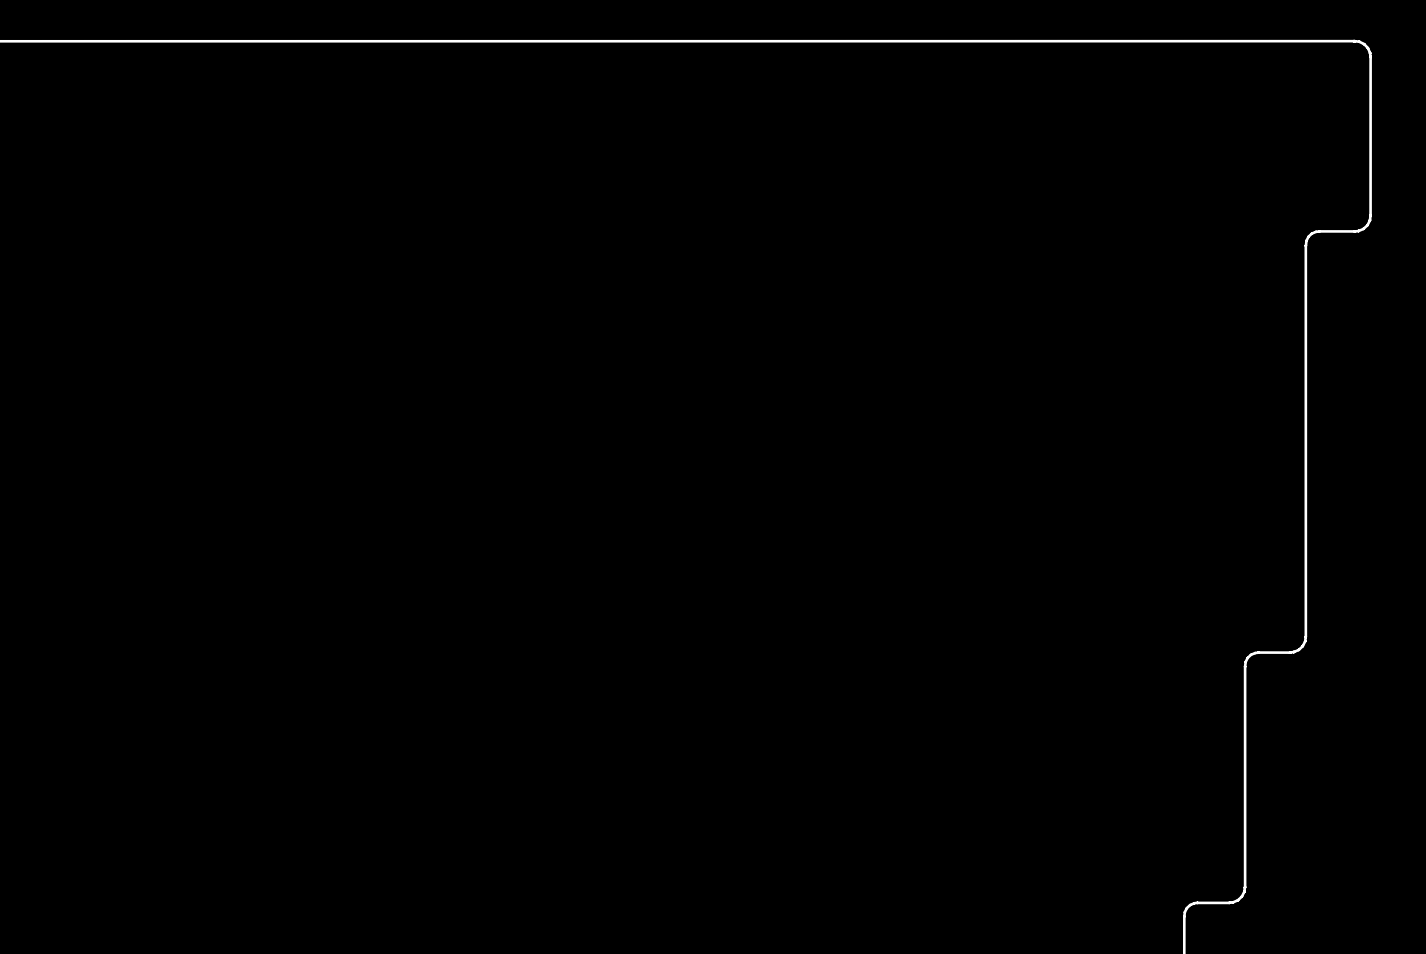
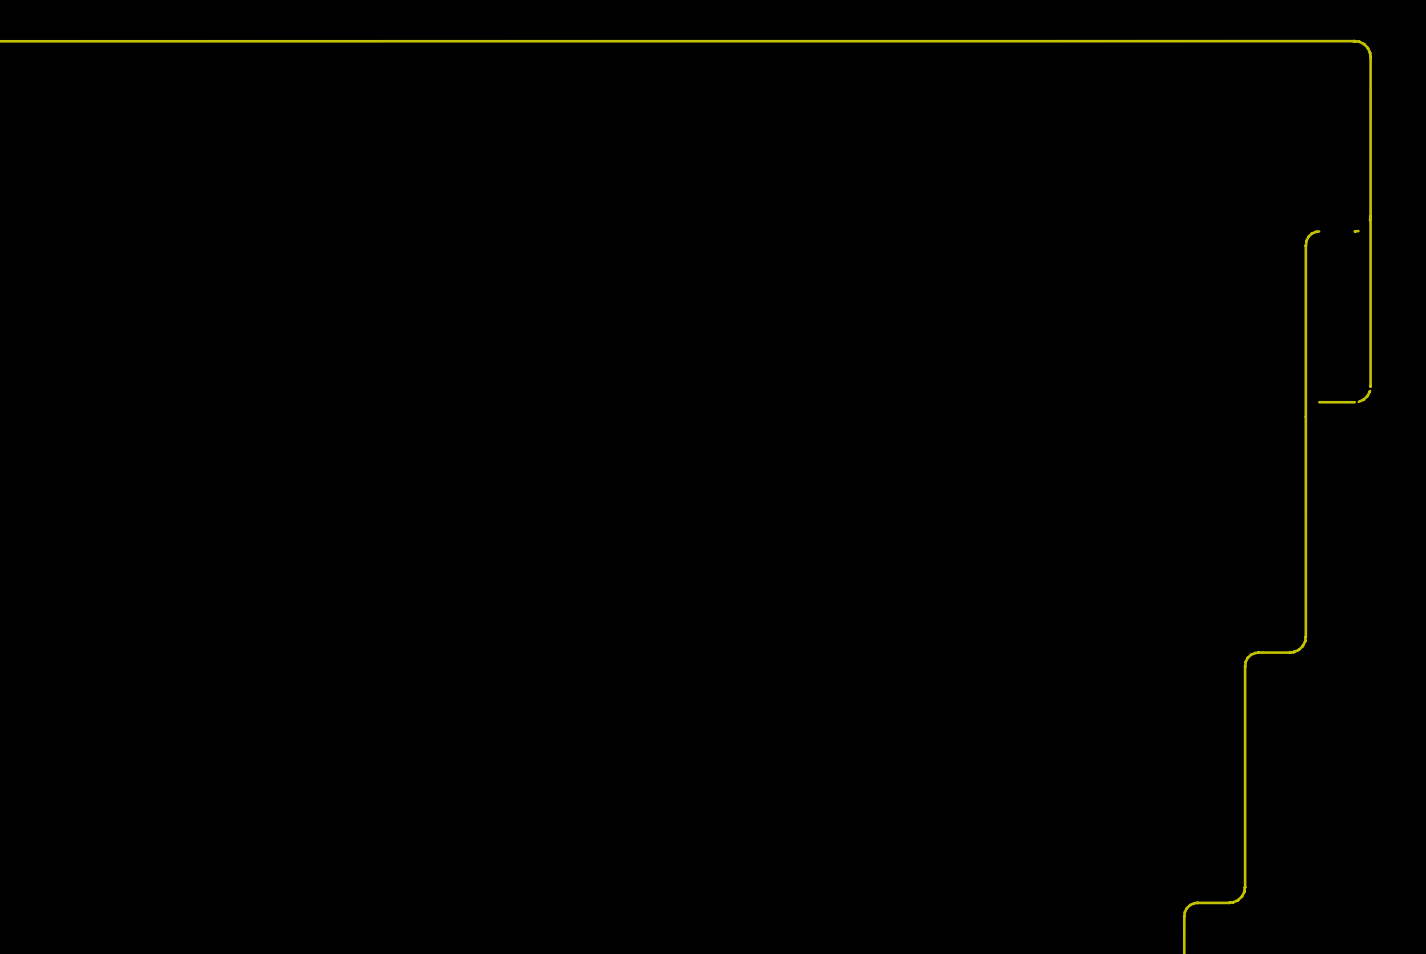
board edge: (1370, 57) (1370, 215) -> (1370, 57) (1370, 386)
board edge: (1369, 220) (1367, 225) (1358, 230) -> (1369, 391) (1367, 396) (1358, 401)
board edge: (1319, 231) (1354, 231) -> (1319, 402) (1354, 402)

